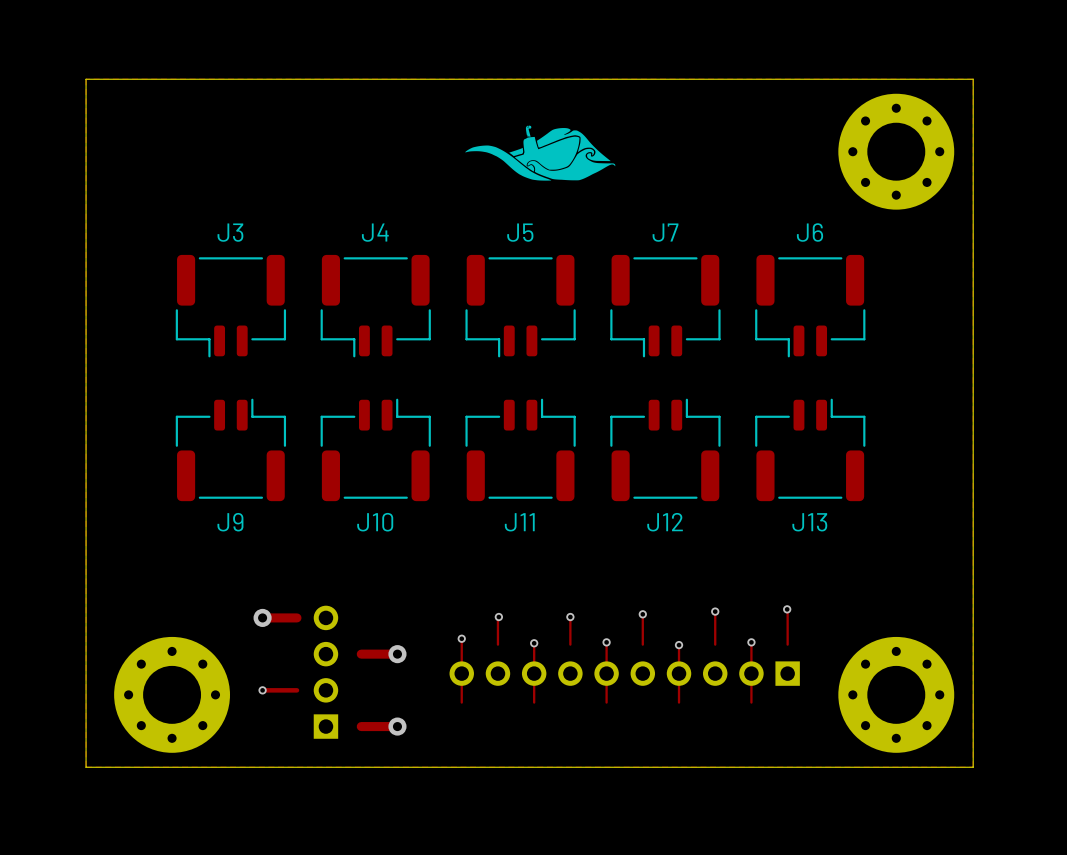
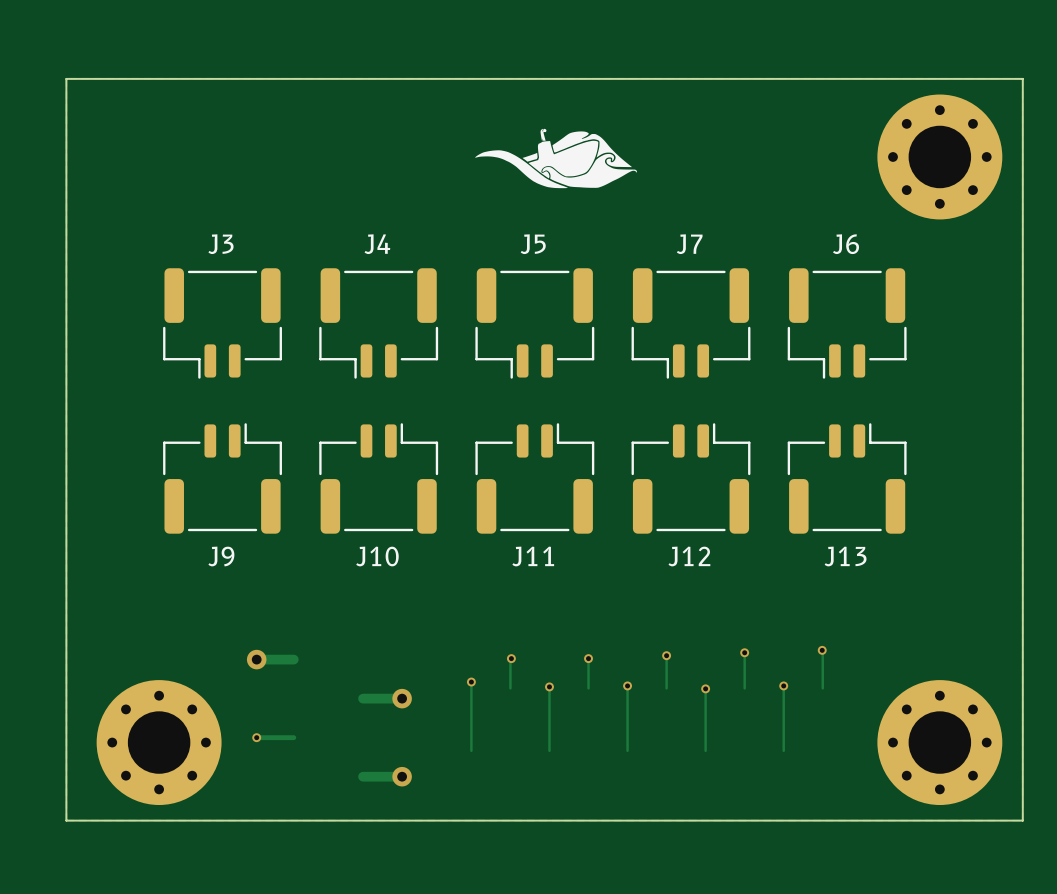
part: (325, 672) -> none
part: (624, 673) -> none

